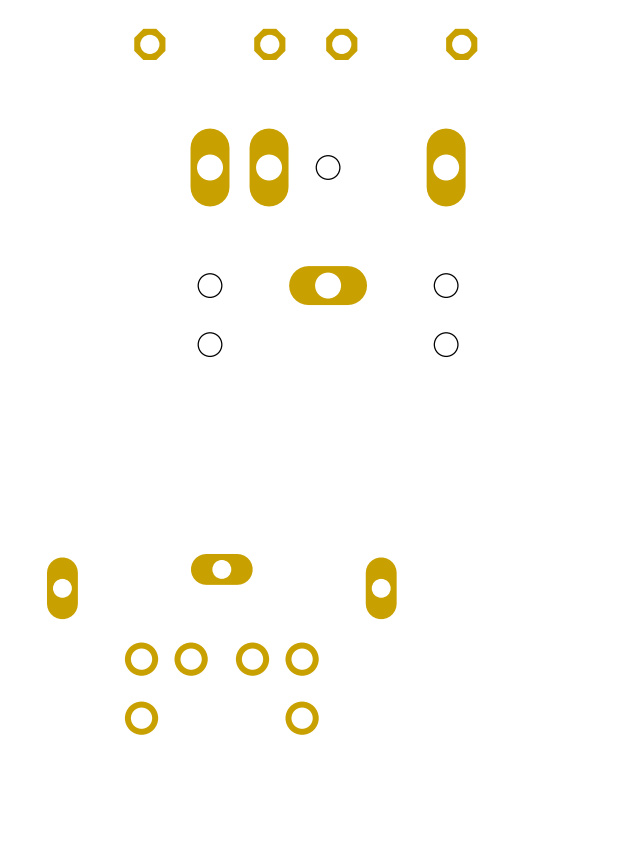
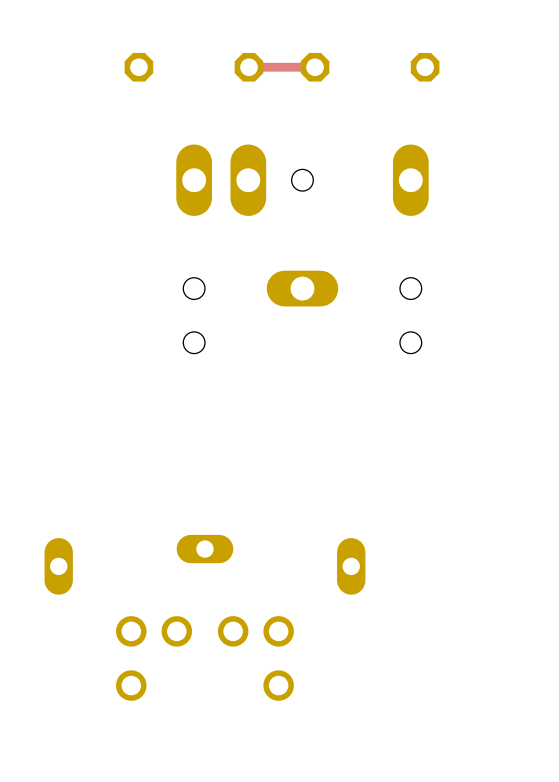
top track: none -> (315, 67) (249, 67)

